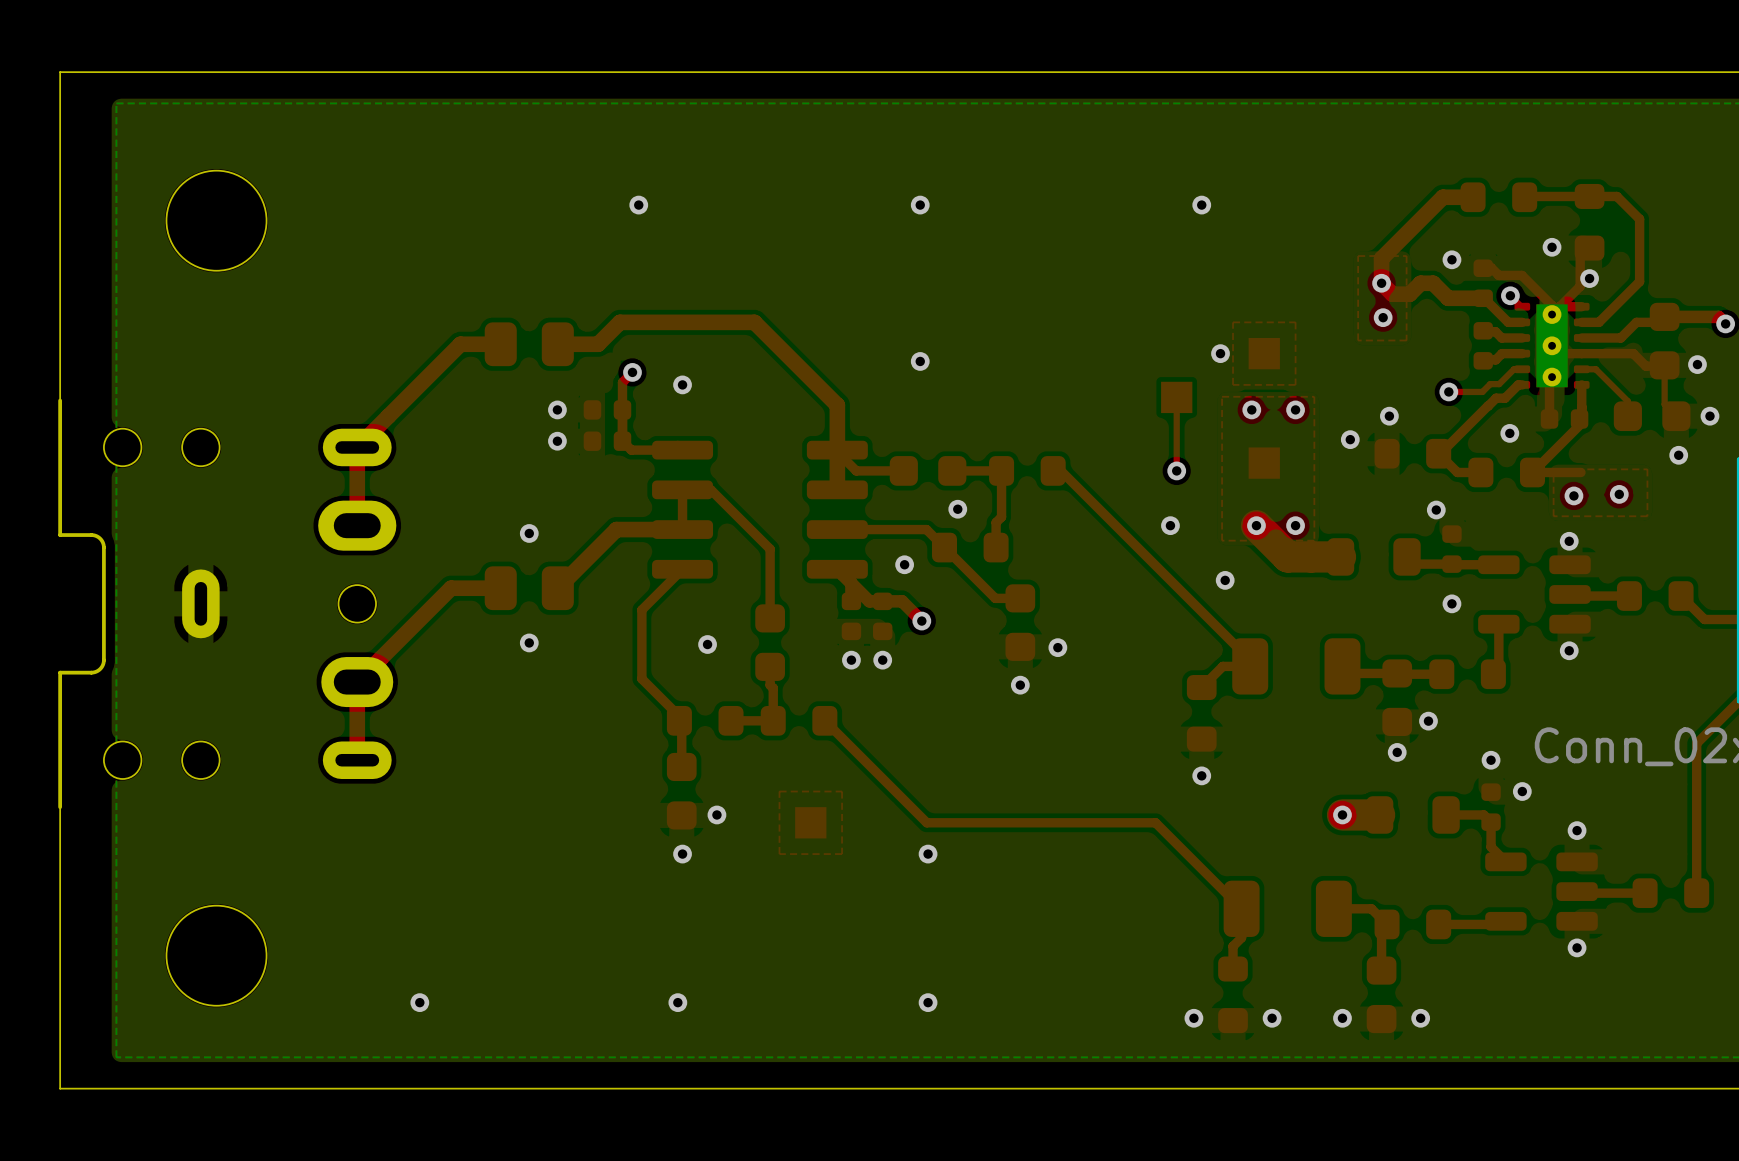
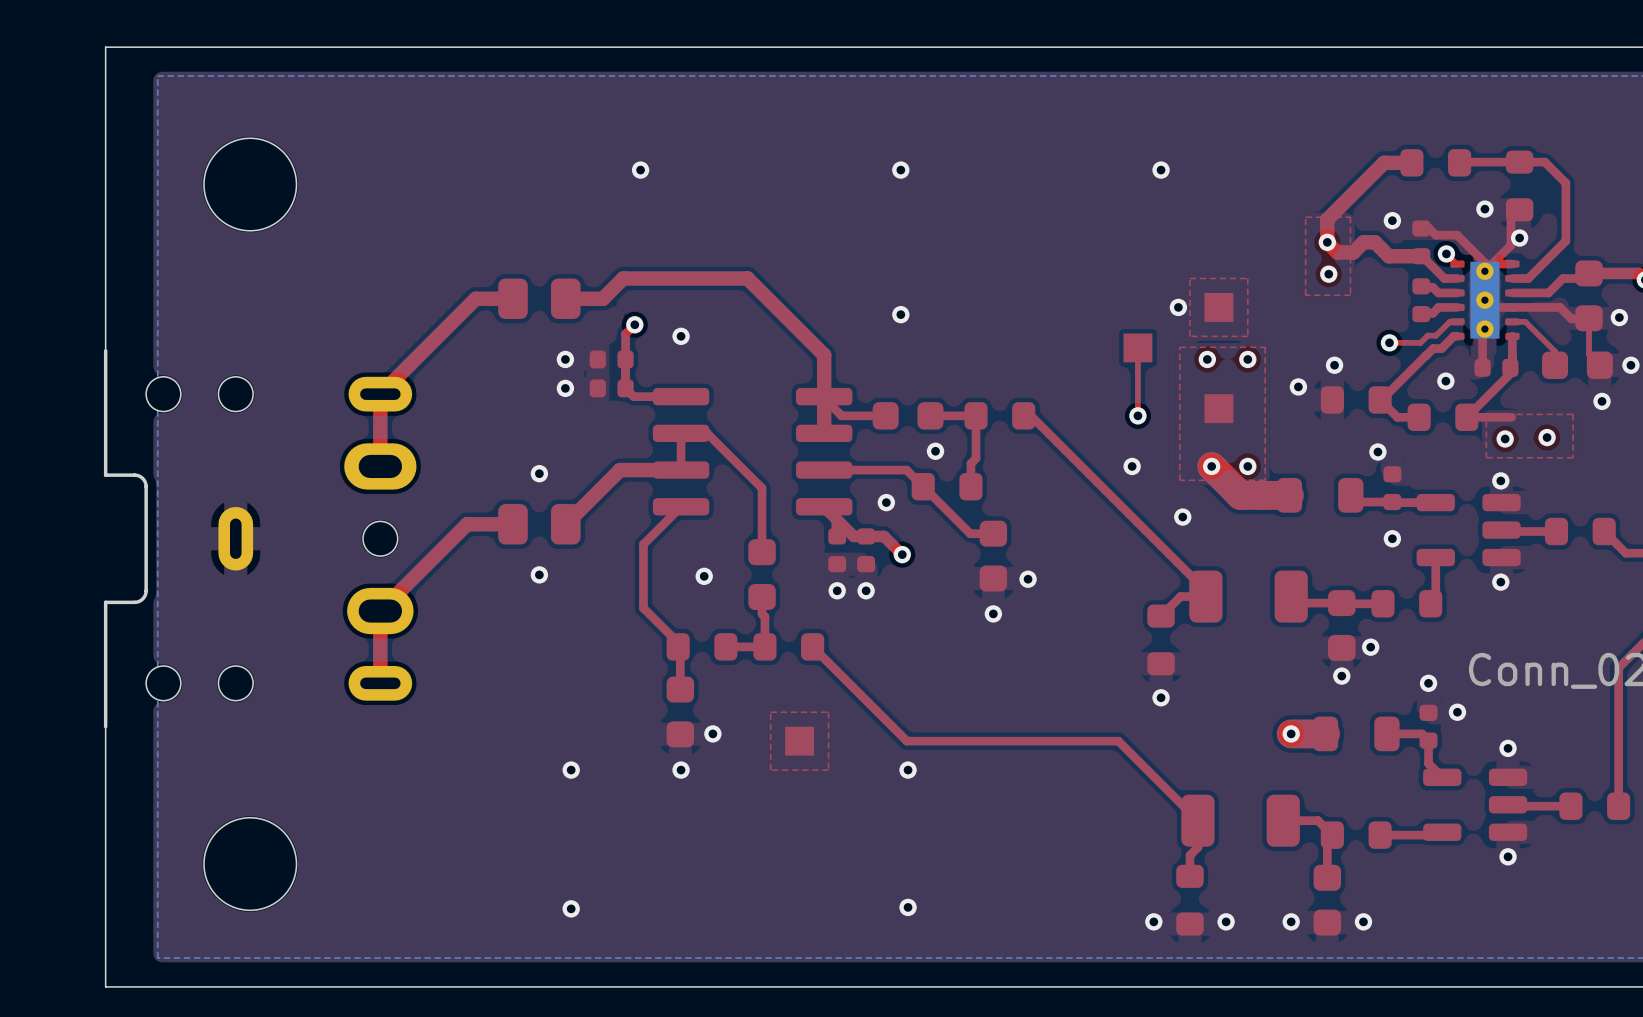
via: none -> (571, 770)
via: (419, 1002) -> none
via: (677, 1002) -> none
via: none -> (571, 908)

